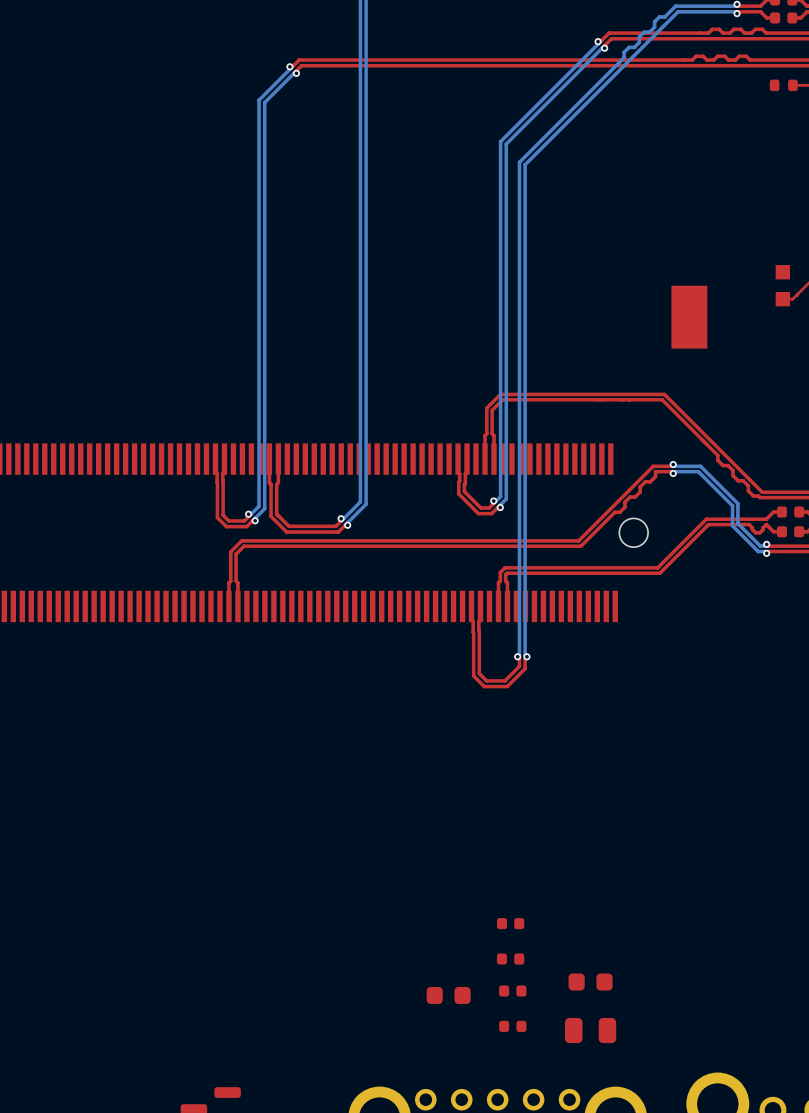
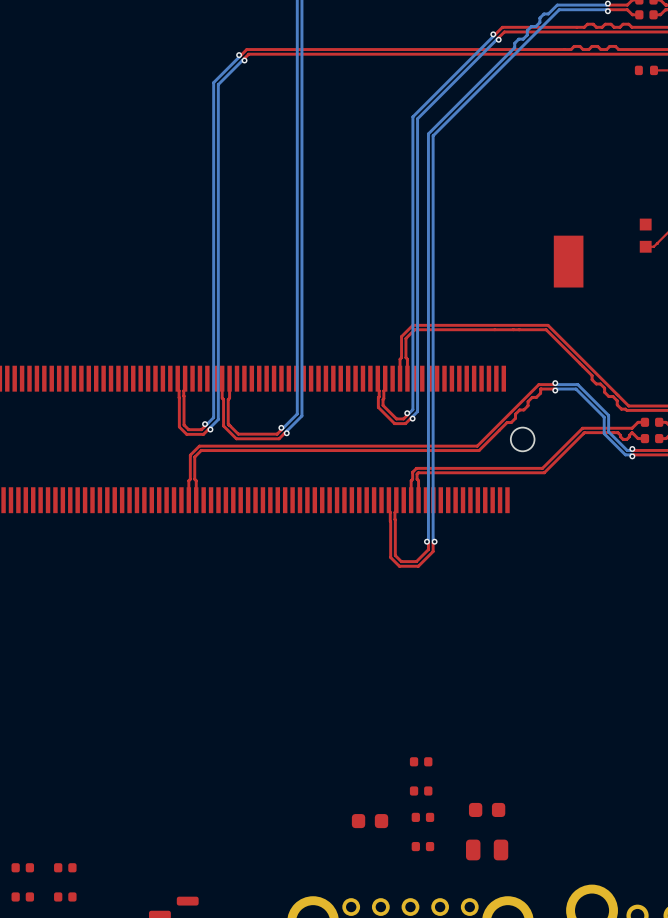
part: none -> (22, 867)
part: none -> (65, 867)
part: none -> (22, 896)
part: none -> (65, 896)

